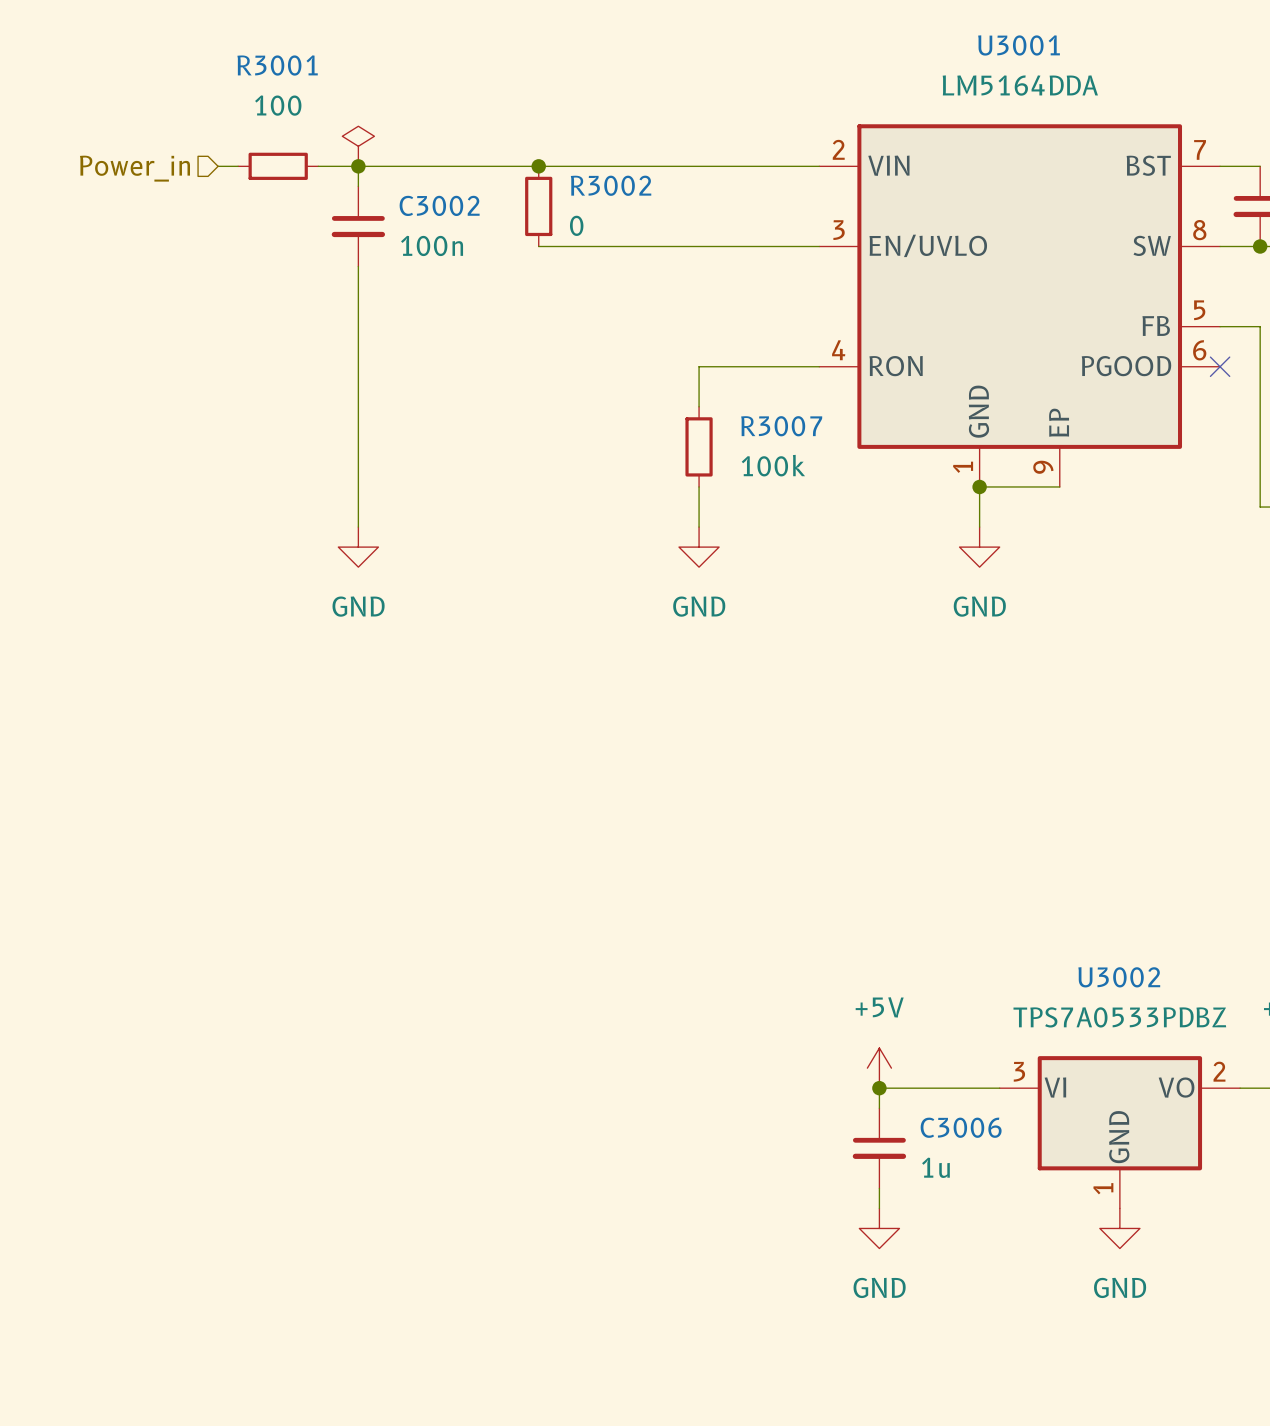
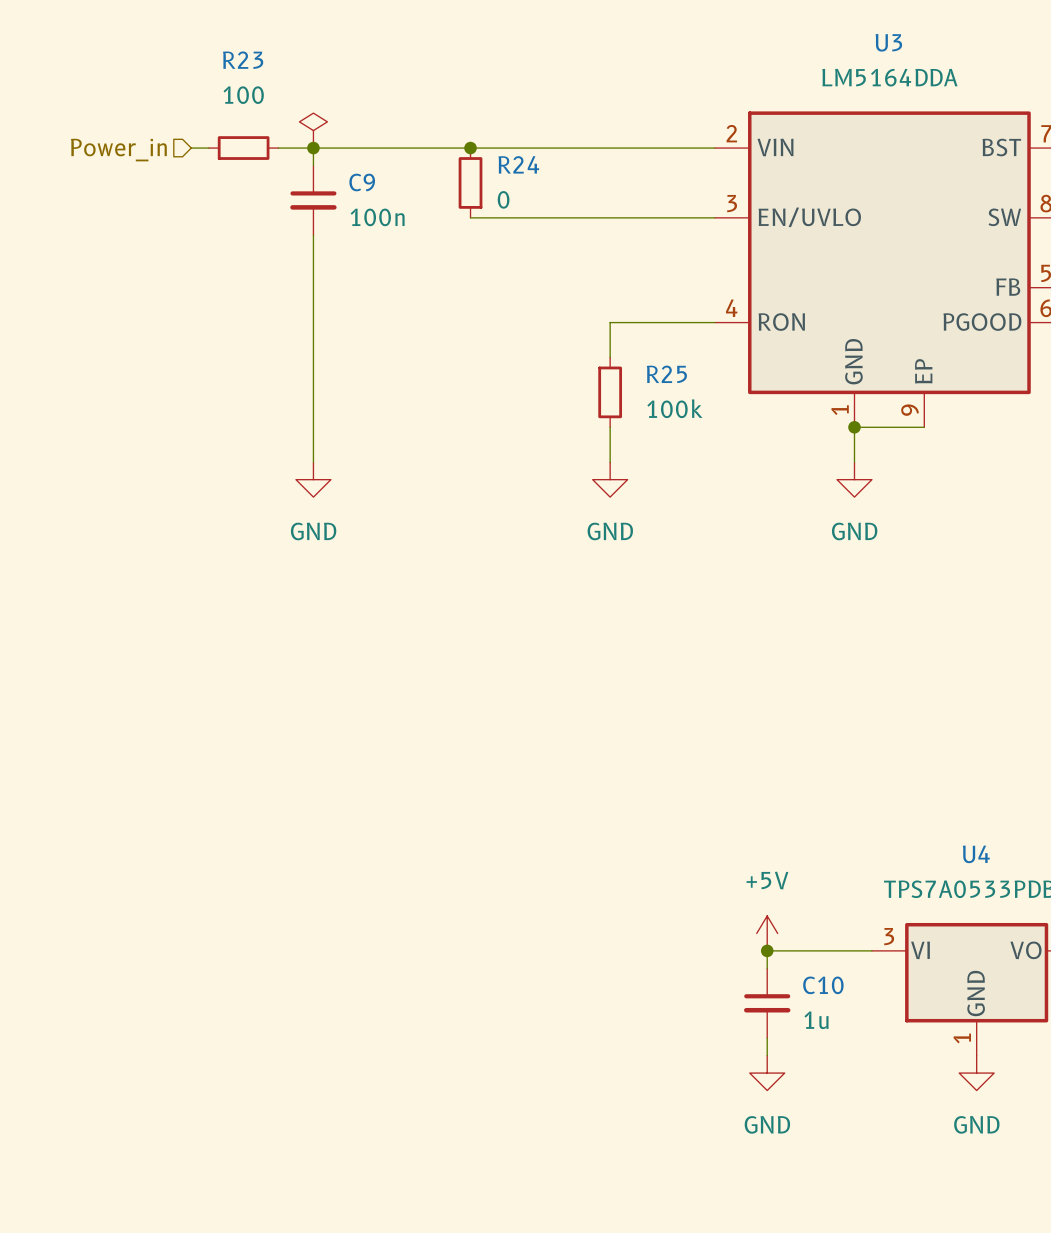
U3001 name: U3001 (1019, 45) -> U3 (888, 42)
R3001 name: R3001 (277, 65) -> R23 (243, 60)
R3002 name: R3002 (611, 185) -> R24 (518, 164)
C3002 name: C3002 (439, 205) -> C9 (362, 182)
R3007 name: R3007 (781, 426) -> R25 (666, 374)
U3002 name: U3002 (1119, 977) -> U4 (976, 854)
C3006 name: C3006 (961, 1127) -> C10 (823, 985)

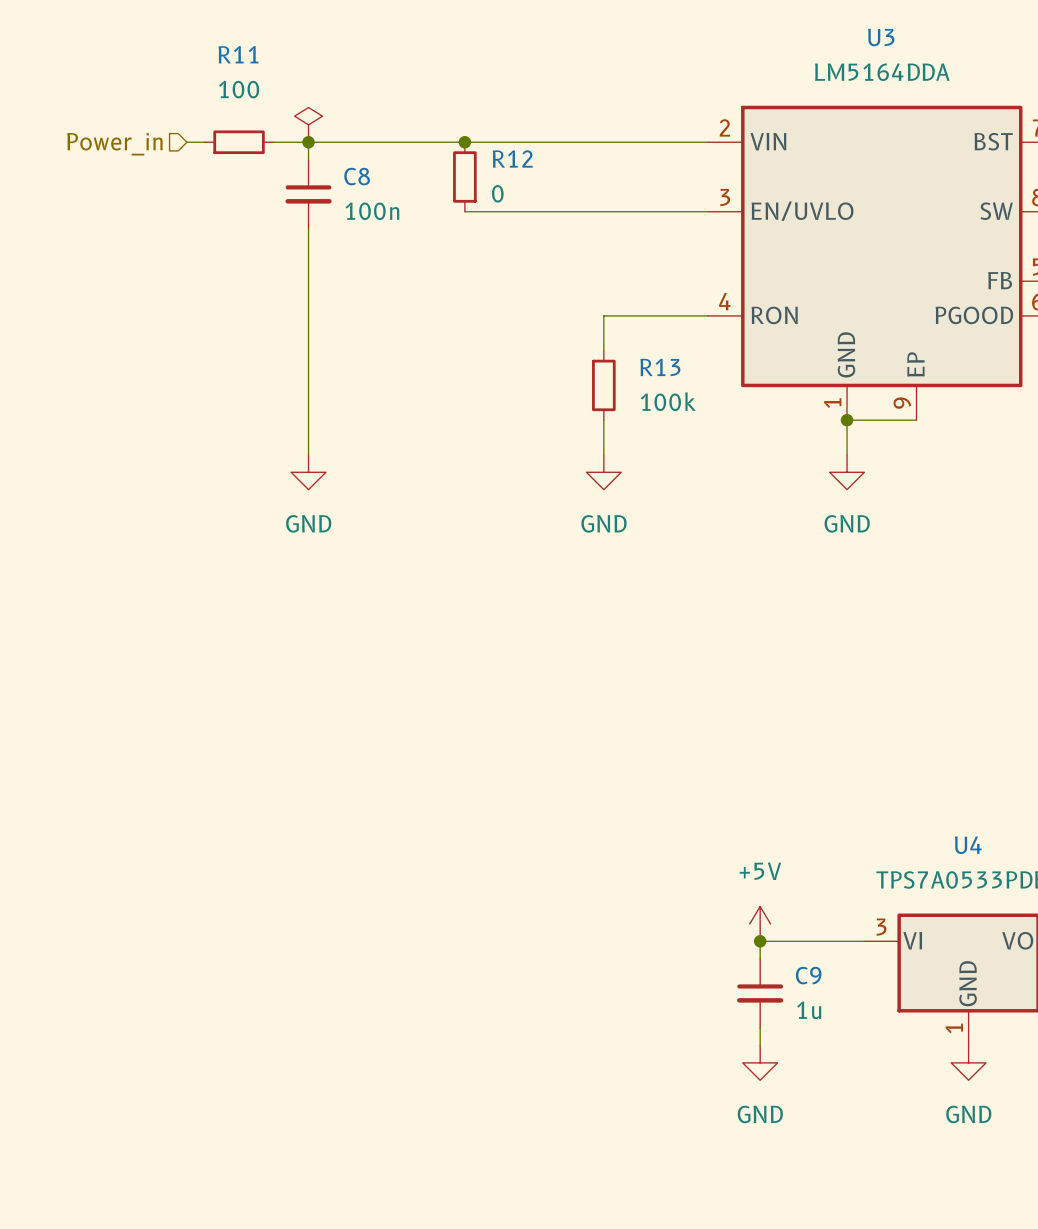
R23 name: R23 (243, 60) -> R11 (238, 54)
R24 name: R24 (518, 164) -> R12 (512, 158)
C9 name: C9 (362, 182) -> C8 (357, 176)
R25 name: R25 (666, 374) -> R13 (660, 367)
C10 name: C10 (823, 985) -> C9 (808, 975)

